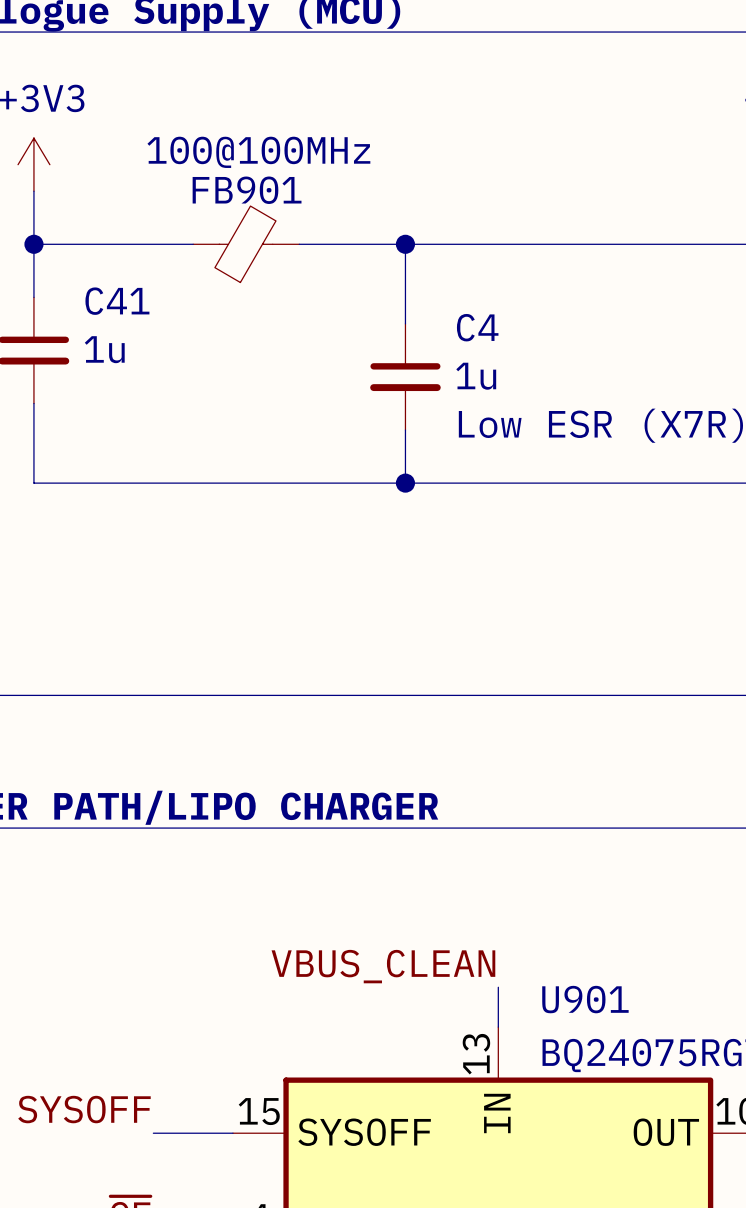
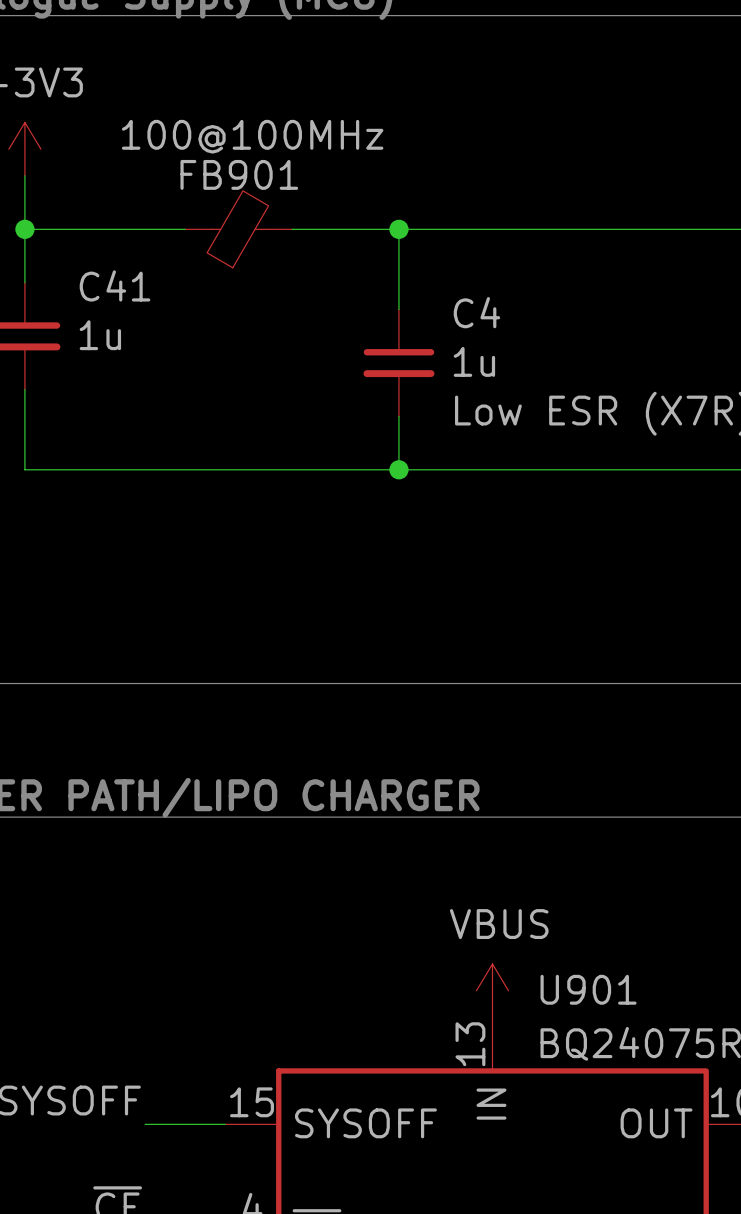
label: VBUS_CLEAN (383, 966) -> none
power symbol: none -> VBUS (492, 990)

